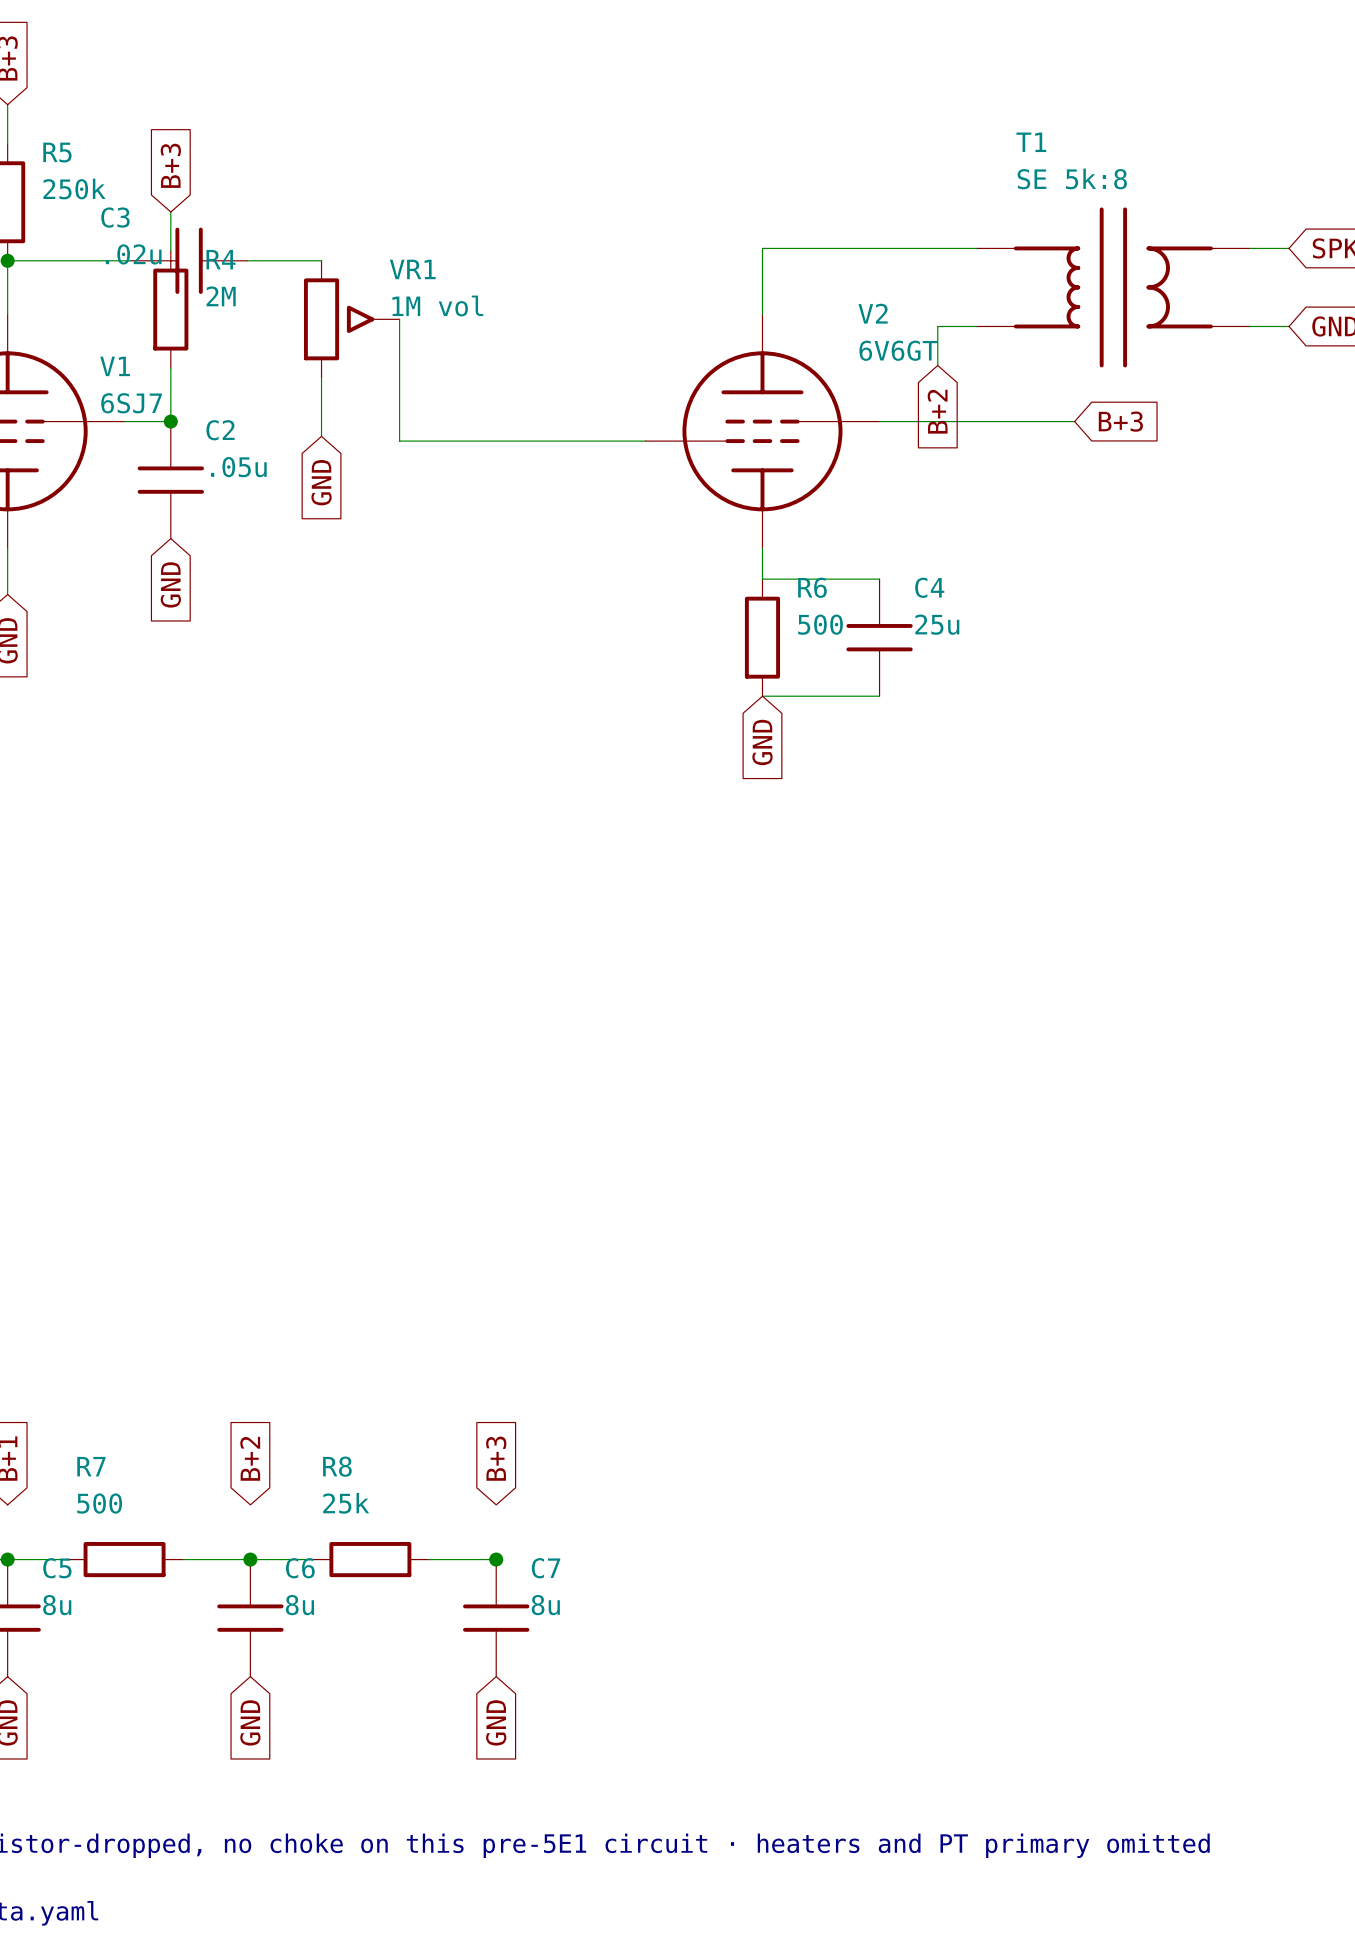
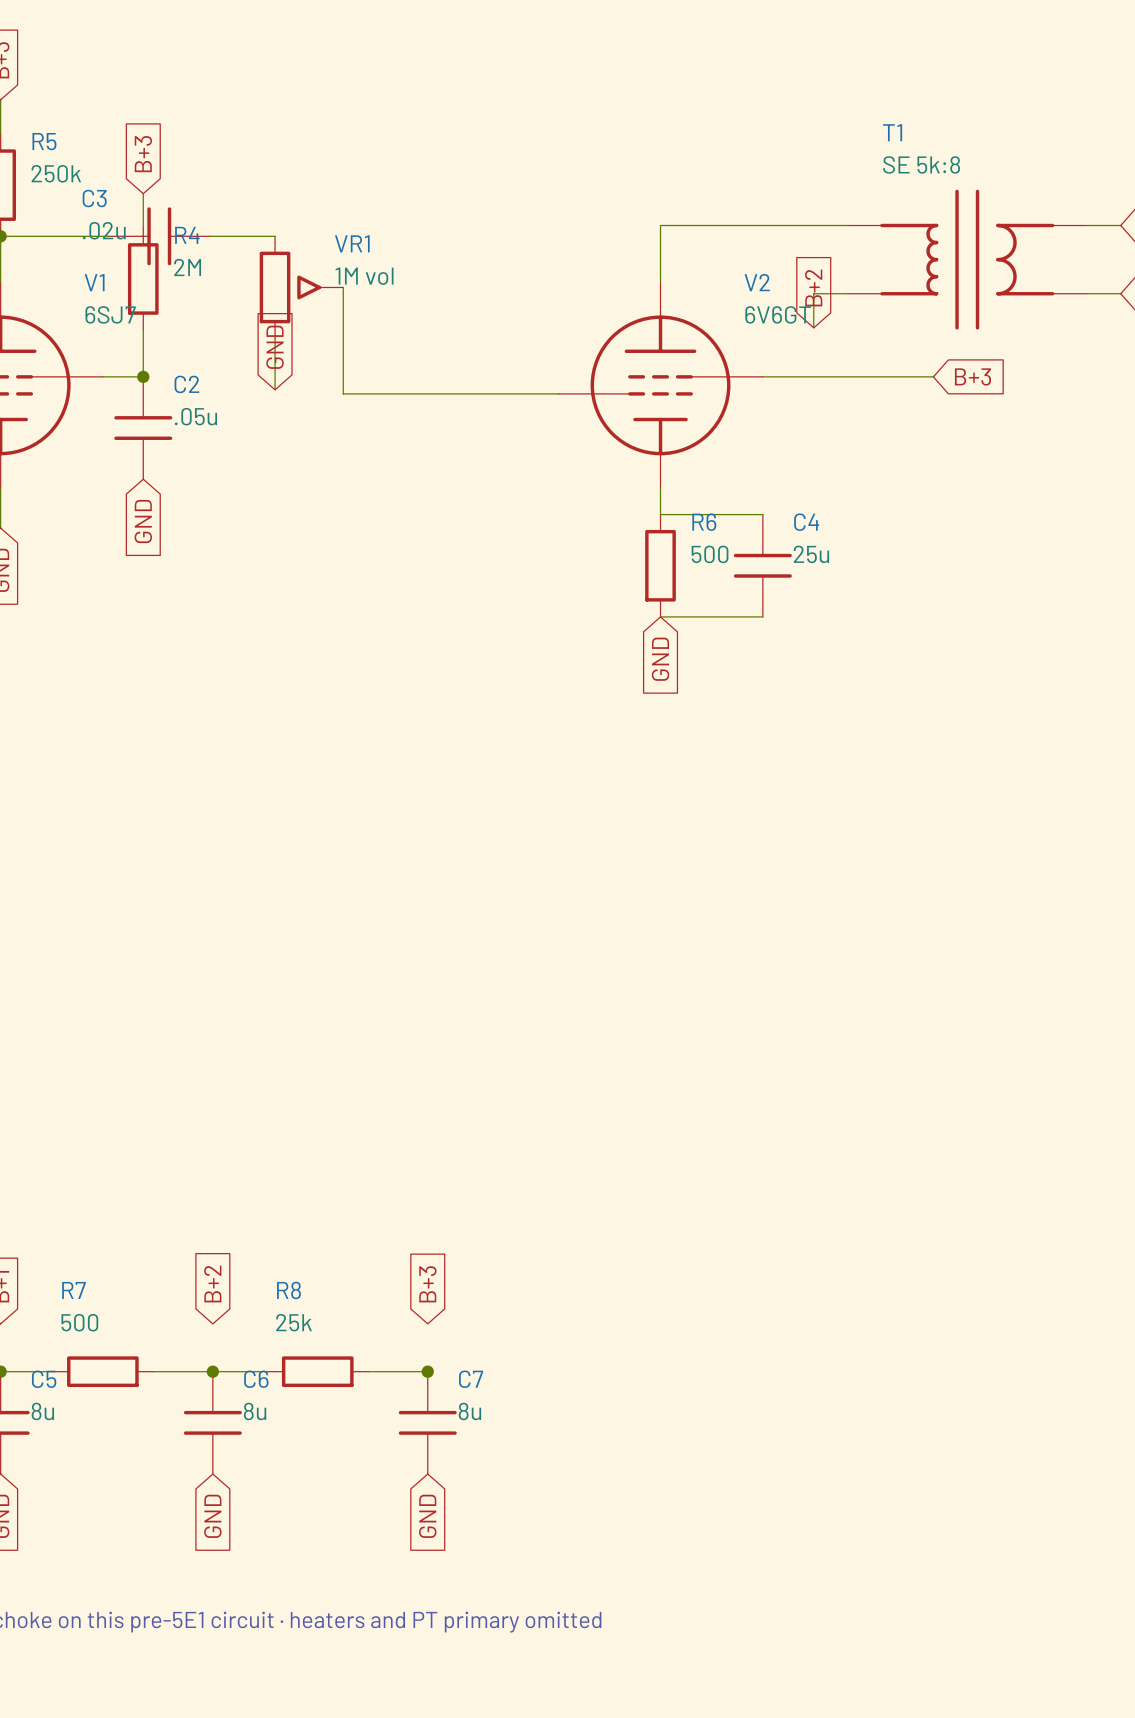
V1 name position: V1 (115, 366) -> V1 (94, 282)
V1 value position: 6SJ7 (131, 403) -> 6SJ7 (110, 314)
global label rotation: 0° (937, 411) -> 180° (813, 287)
global label rotation: 0° (321, 482) -> 180° (275, 347)

